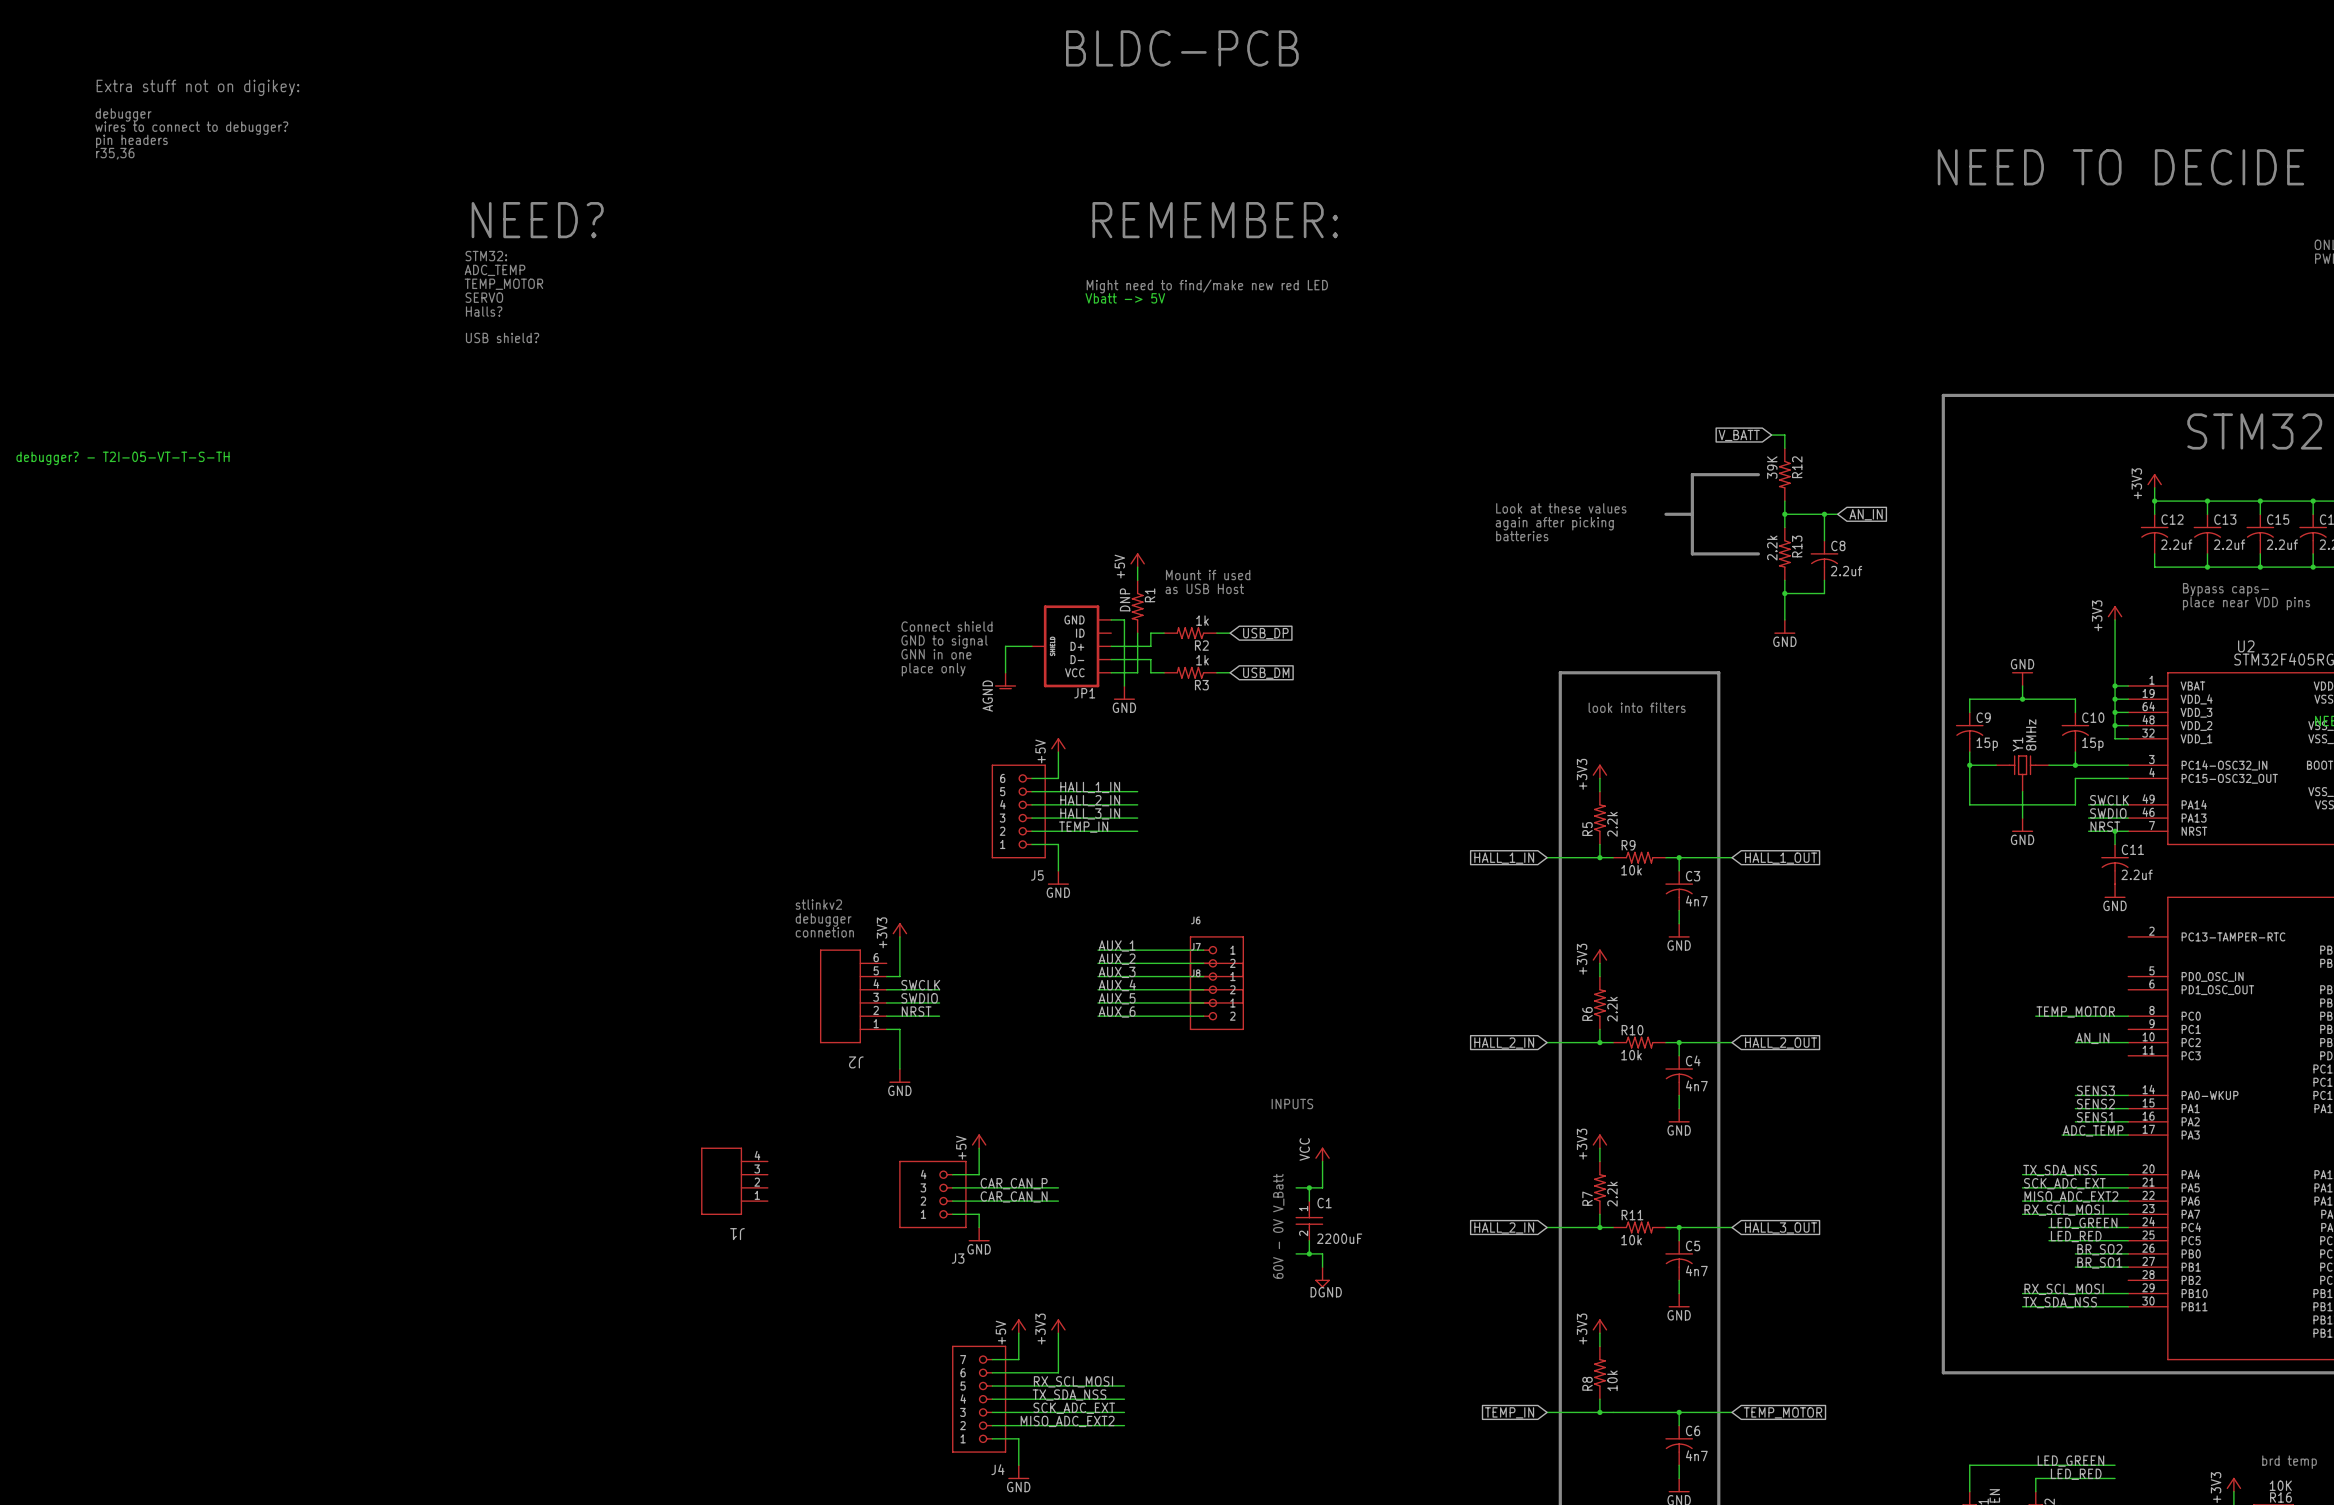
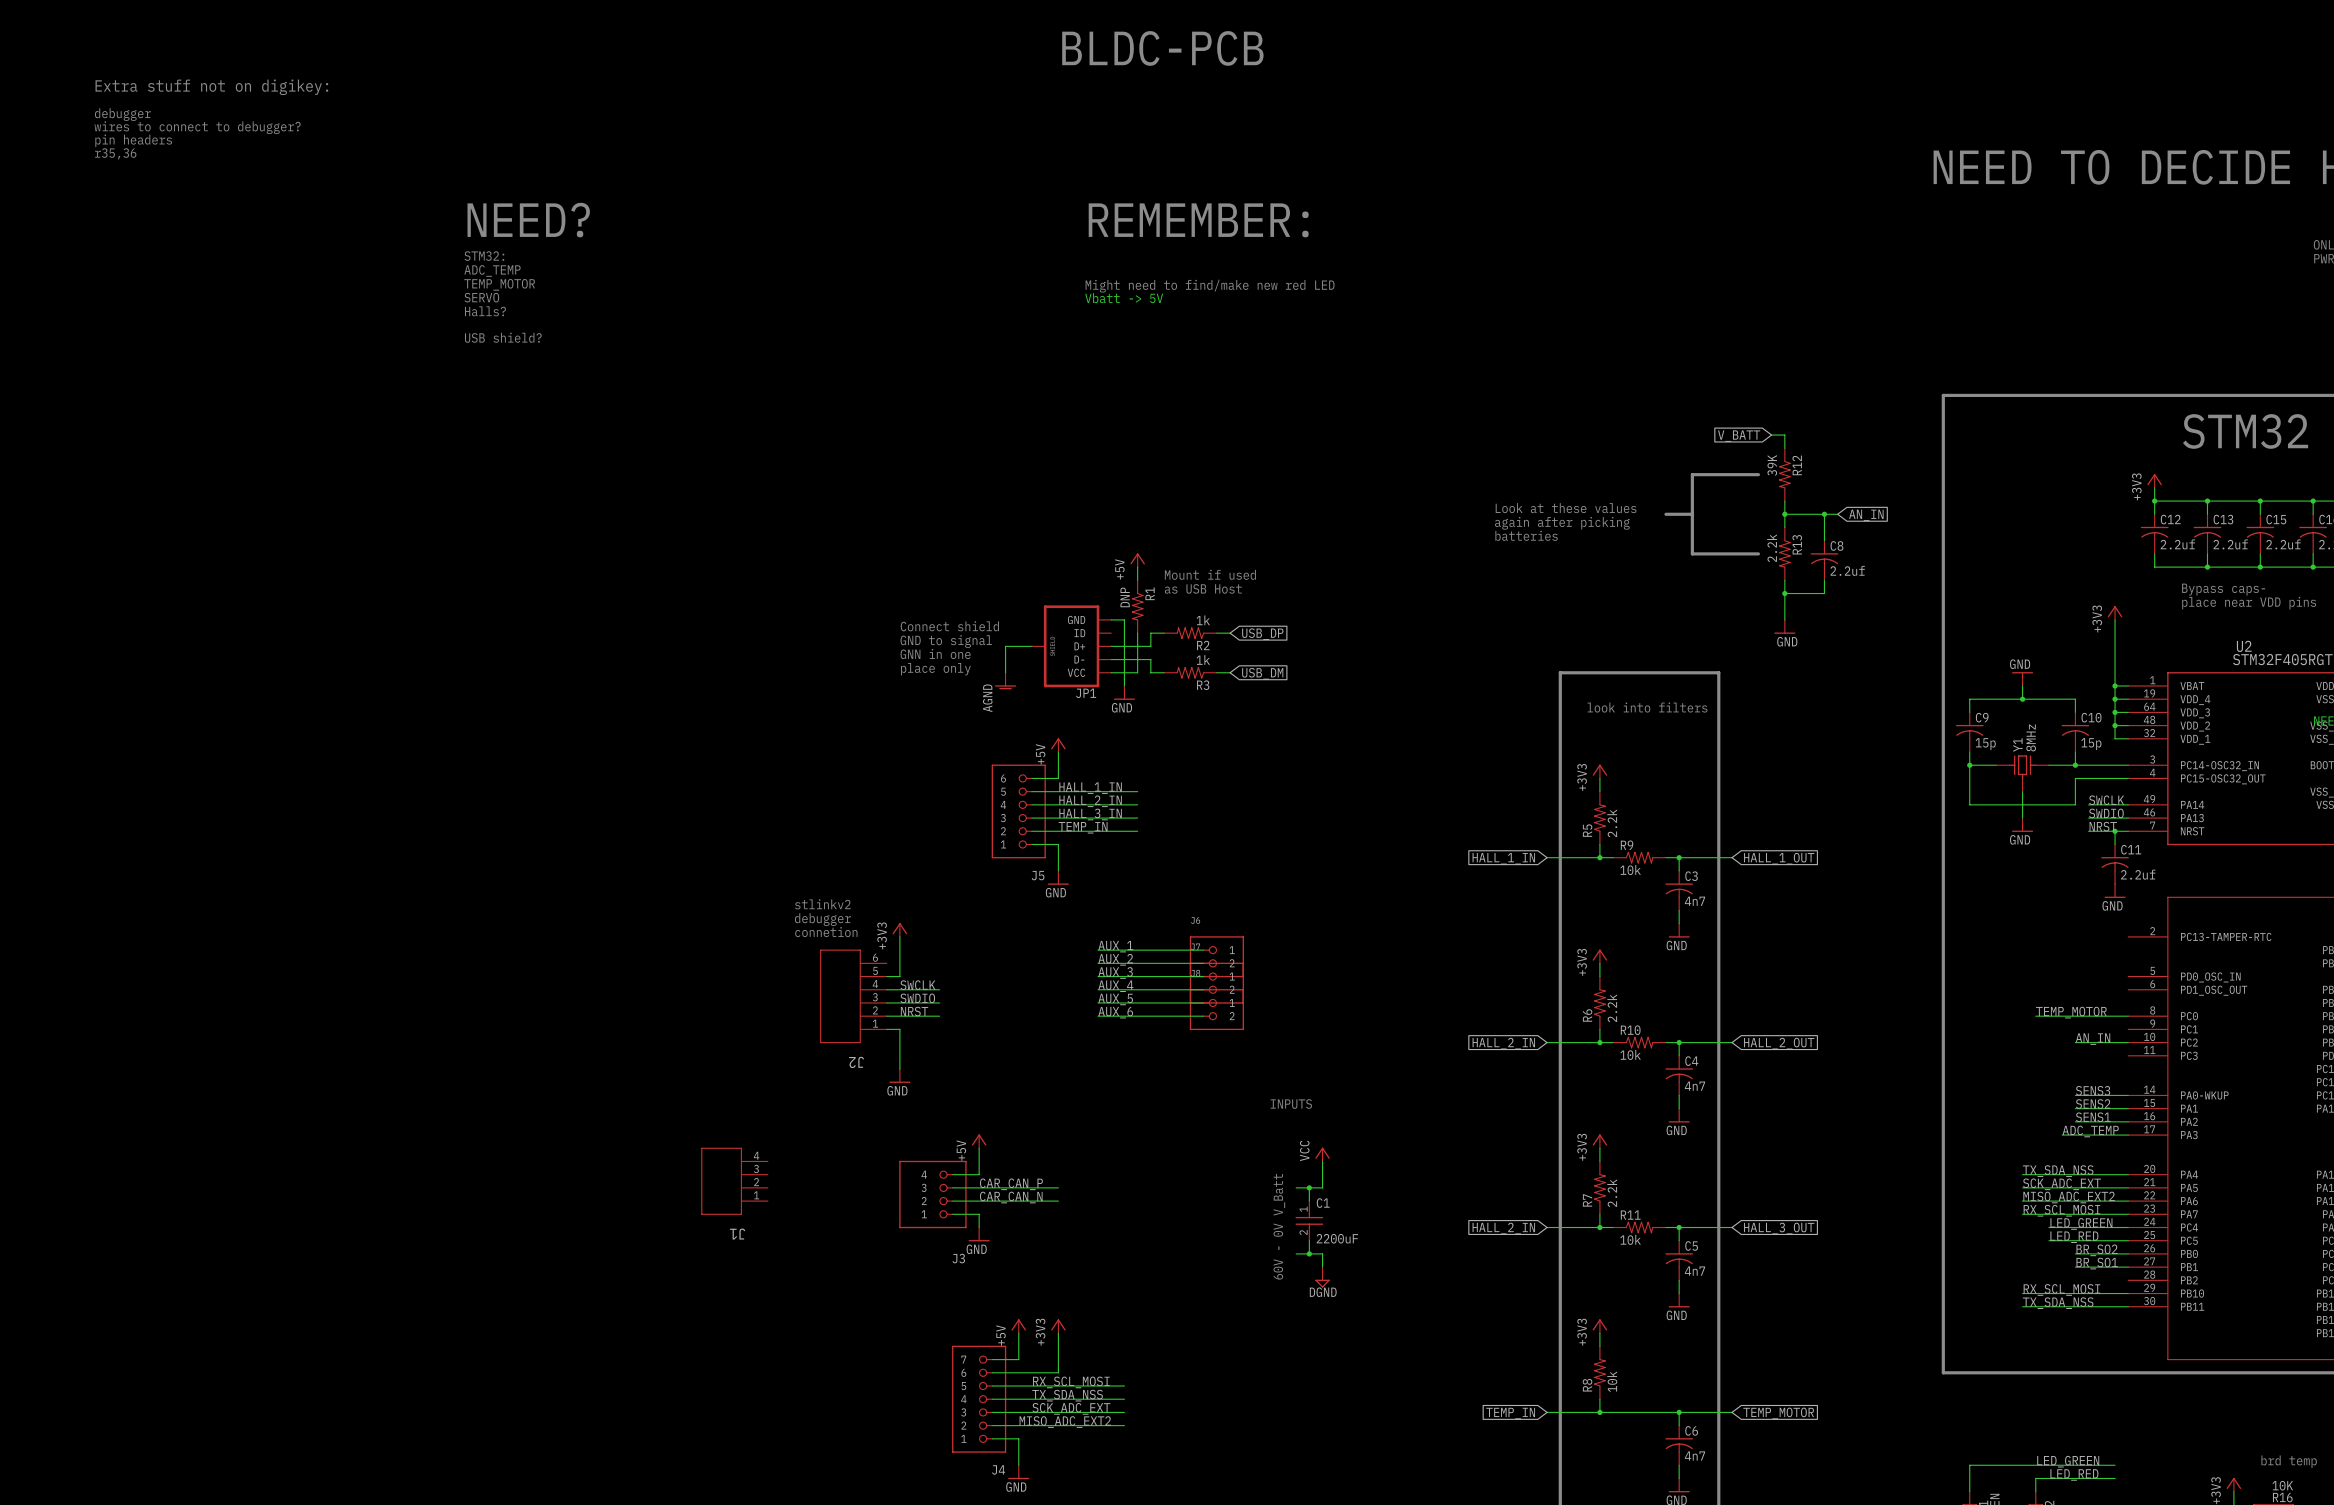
text: debugger? - T2I-05-VT-T-S-TH (123, 458) -> none

